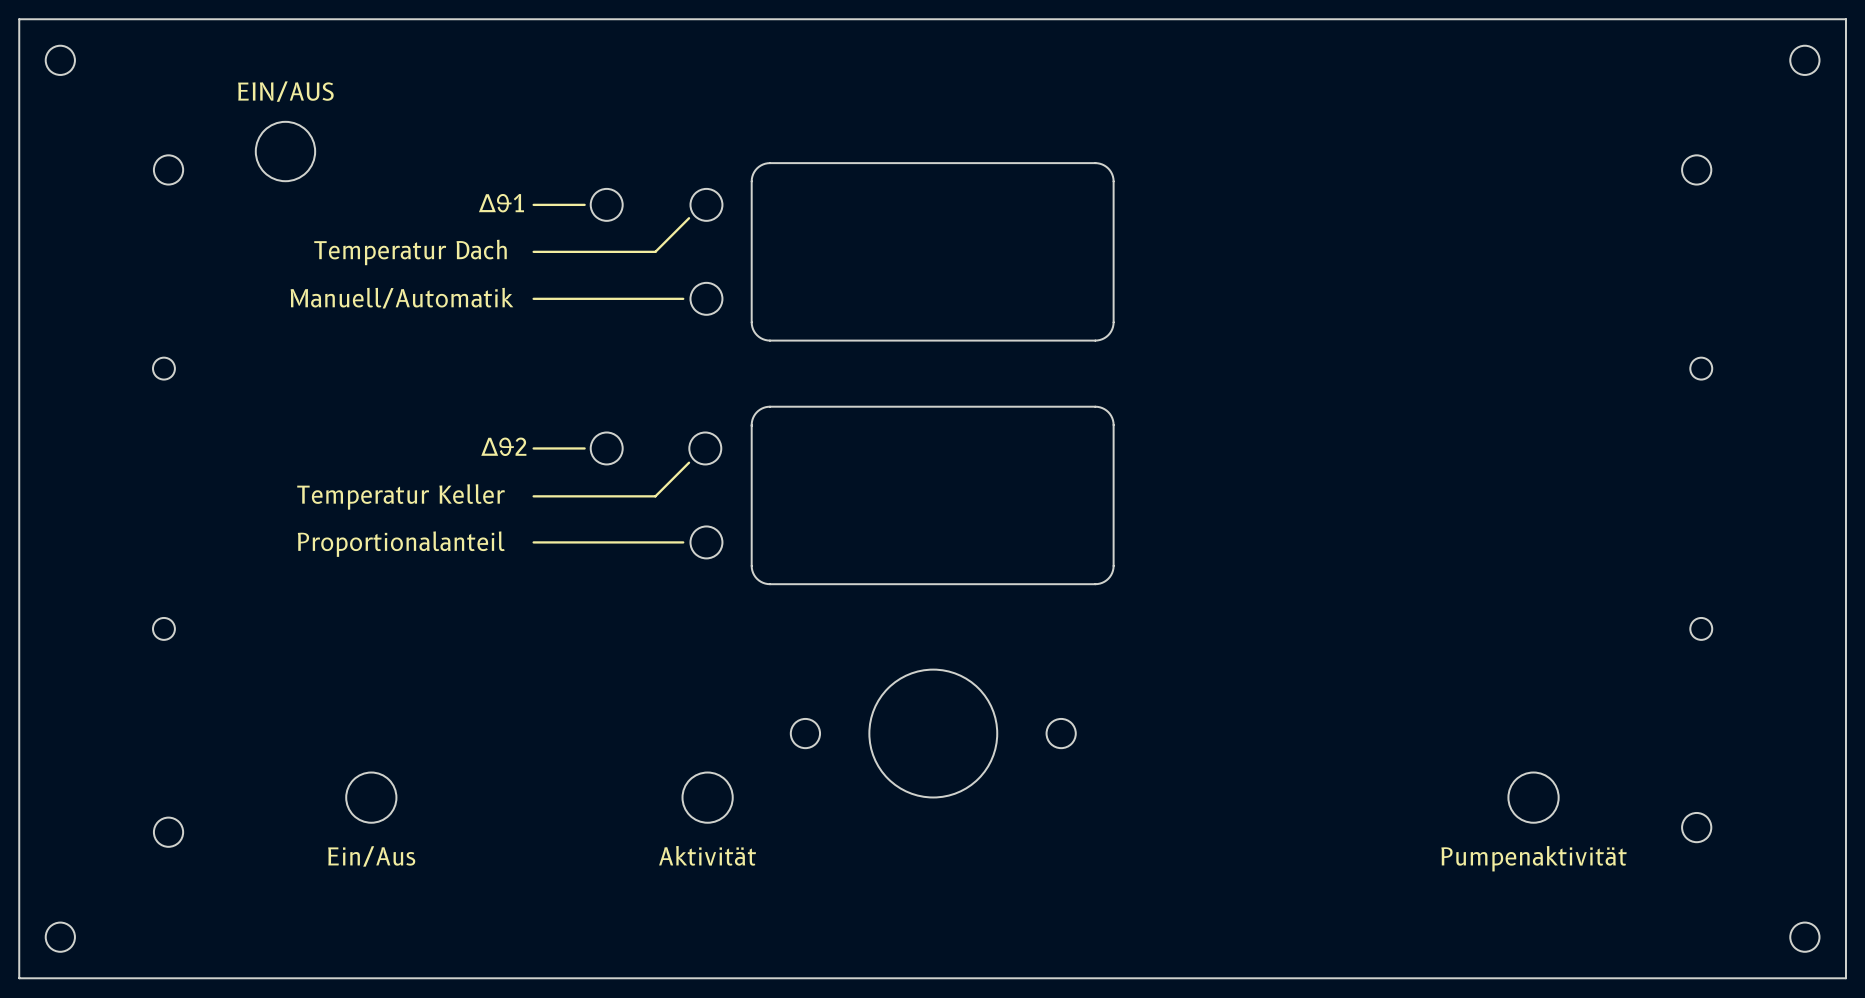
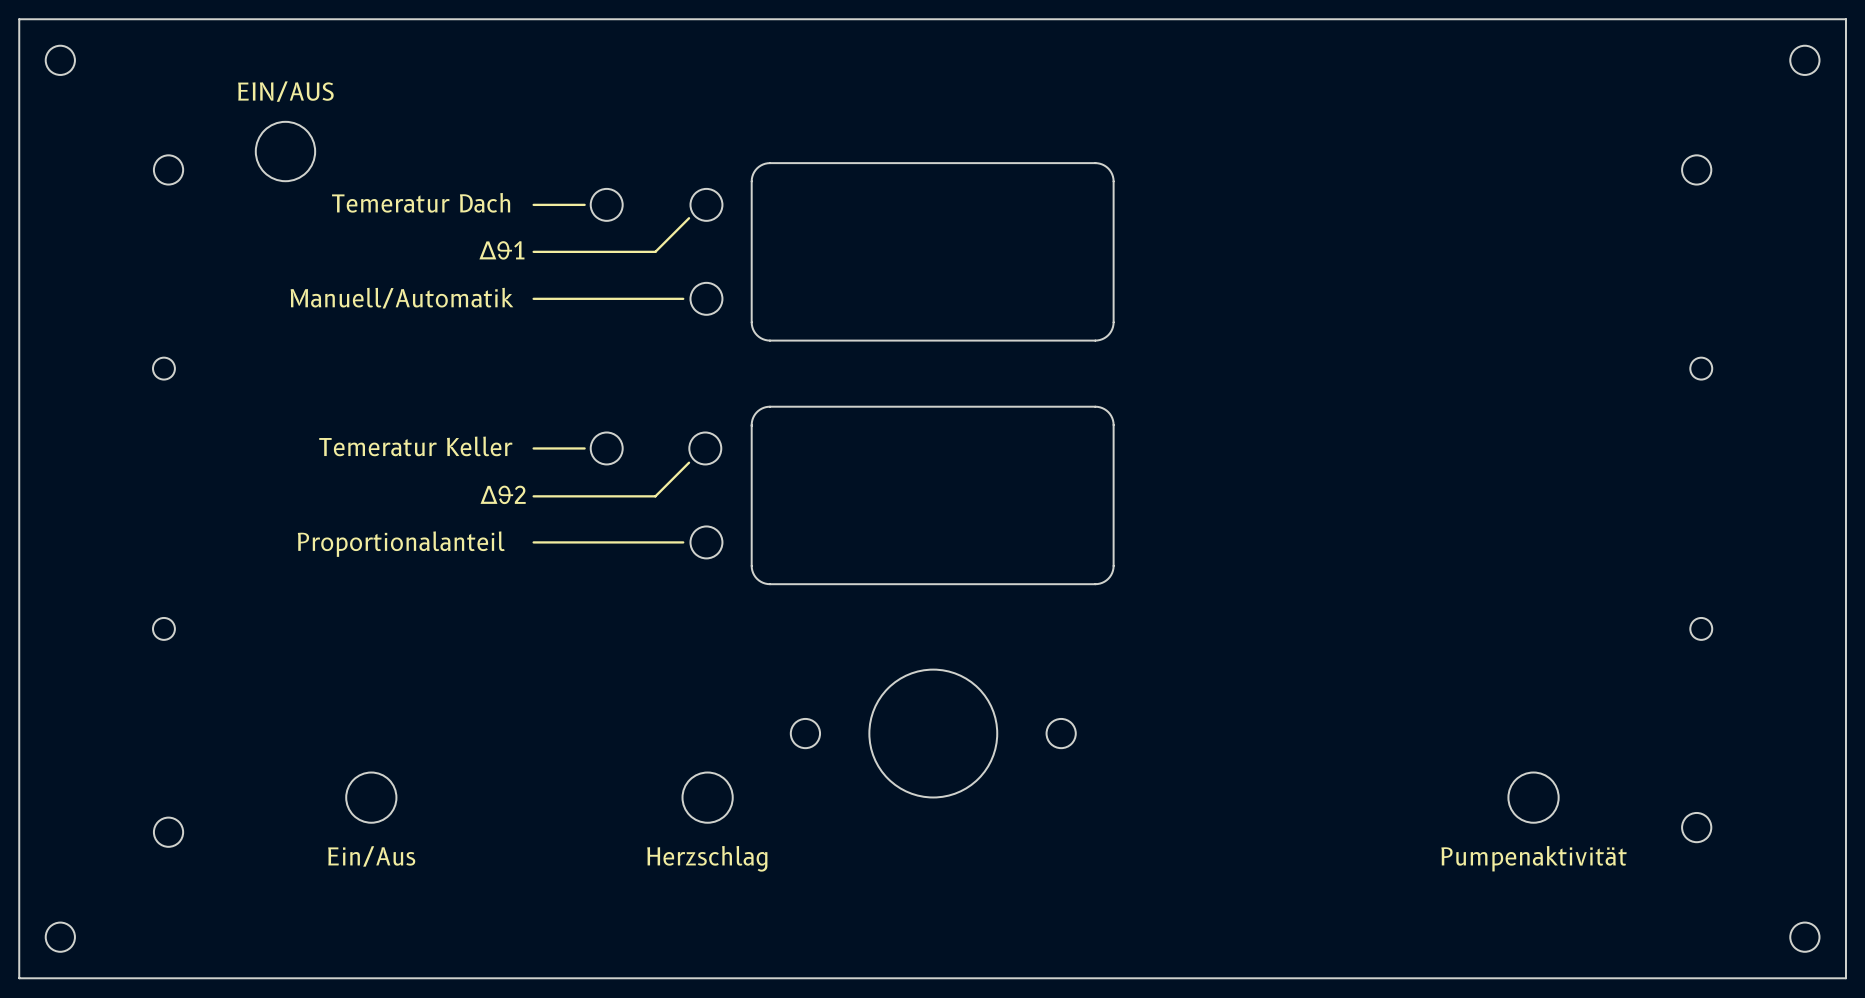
text: none -> Temeratur Dach (421, 202)
text position: ∆ϑ1 (501, 203) -> ∆ϑ1 (501, 250)
text: Temperatur Dach (410, 252) -> none
text: none -> Temeratur Keller (415, 446)
text position: ∆ϑ2 (503, 446) -> ∆ϑ2 (503, 494)
text: Temperatur Keller (401, 496) -> none
text: Aktivität (707, 855) -> Herzschlag (707, 858)

